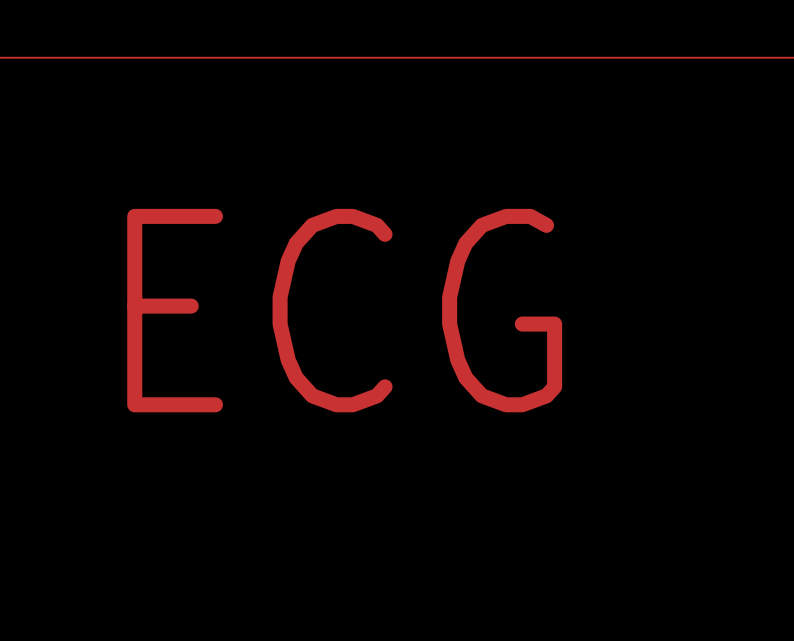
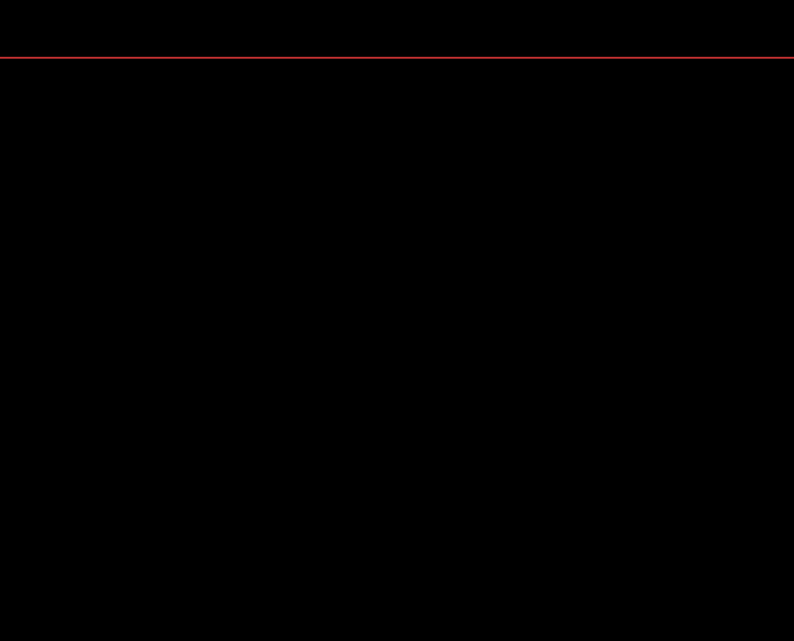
text: ECG (344, 310) -> none

